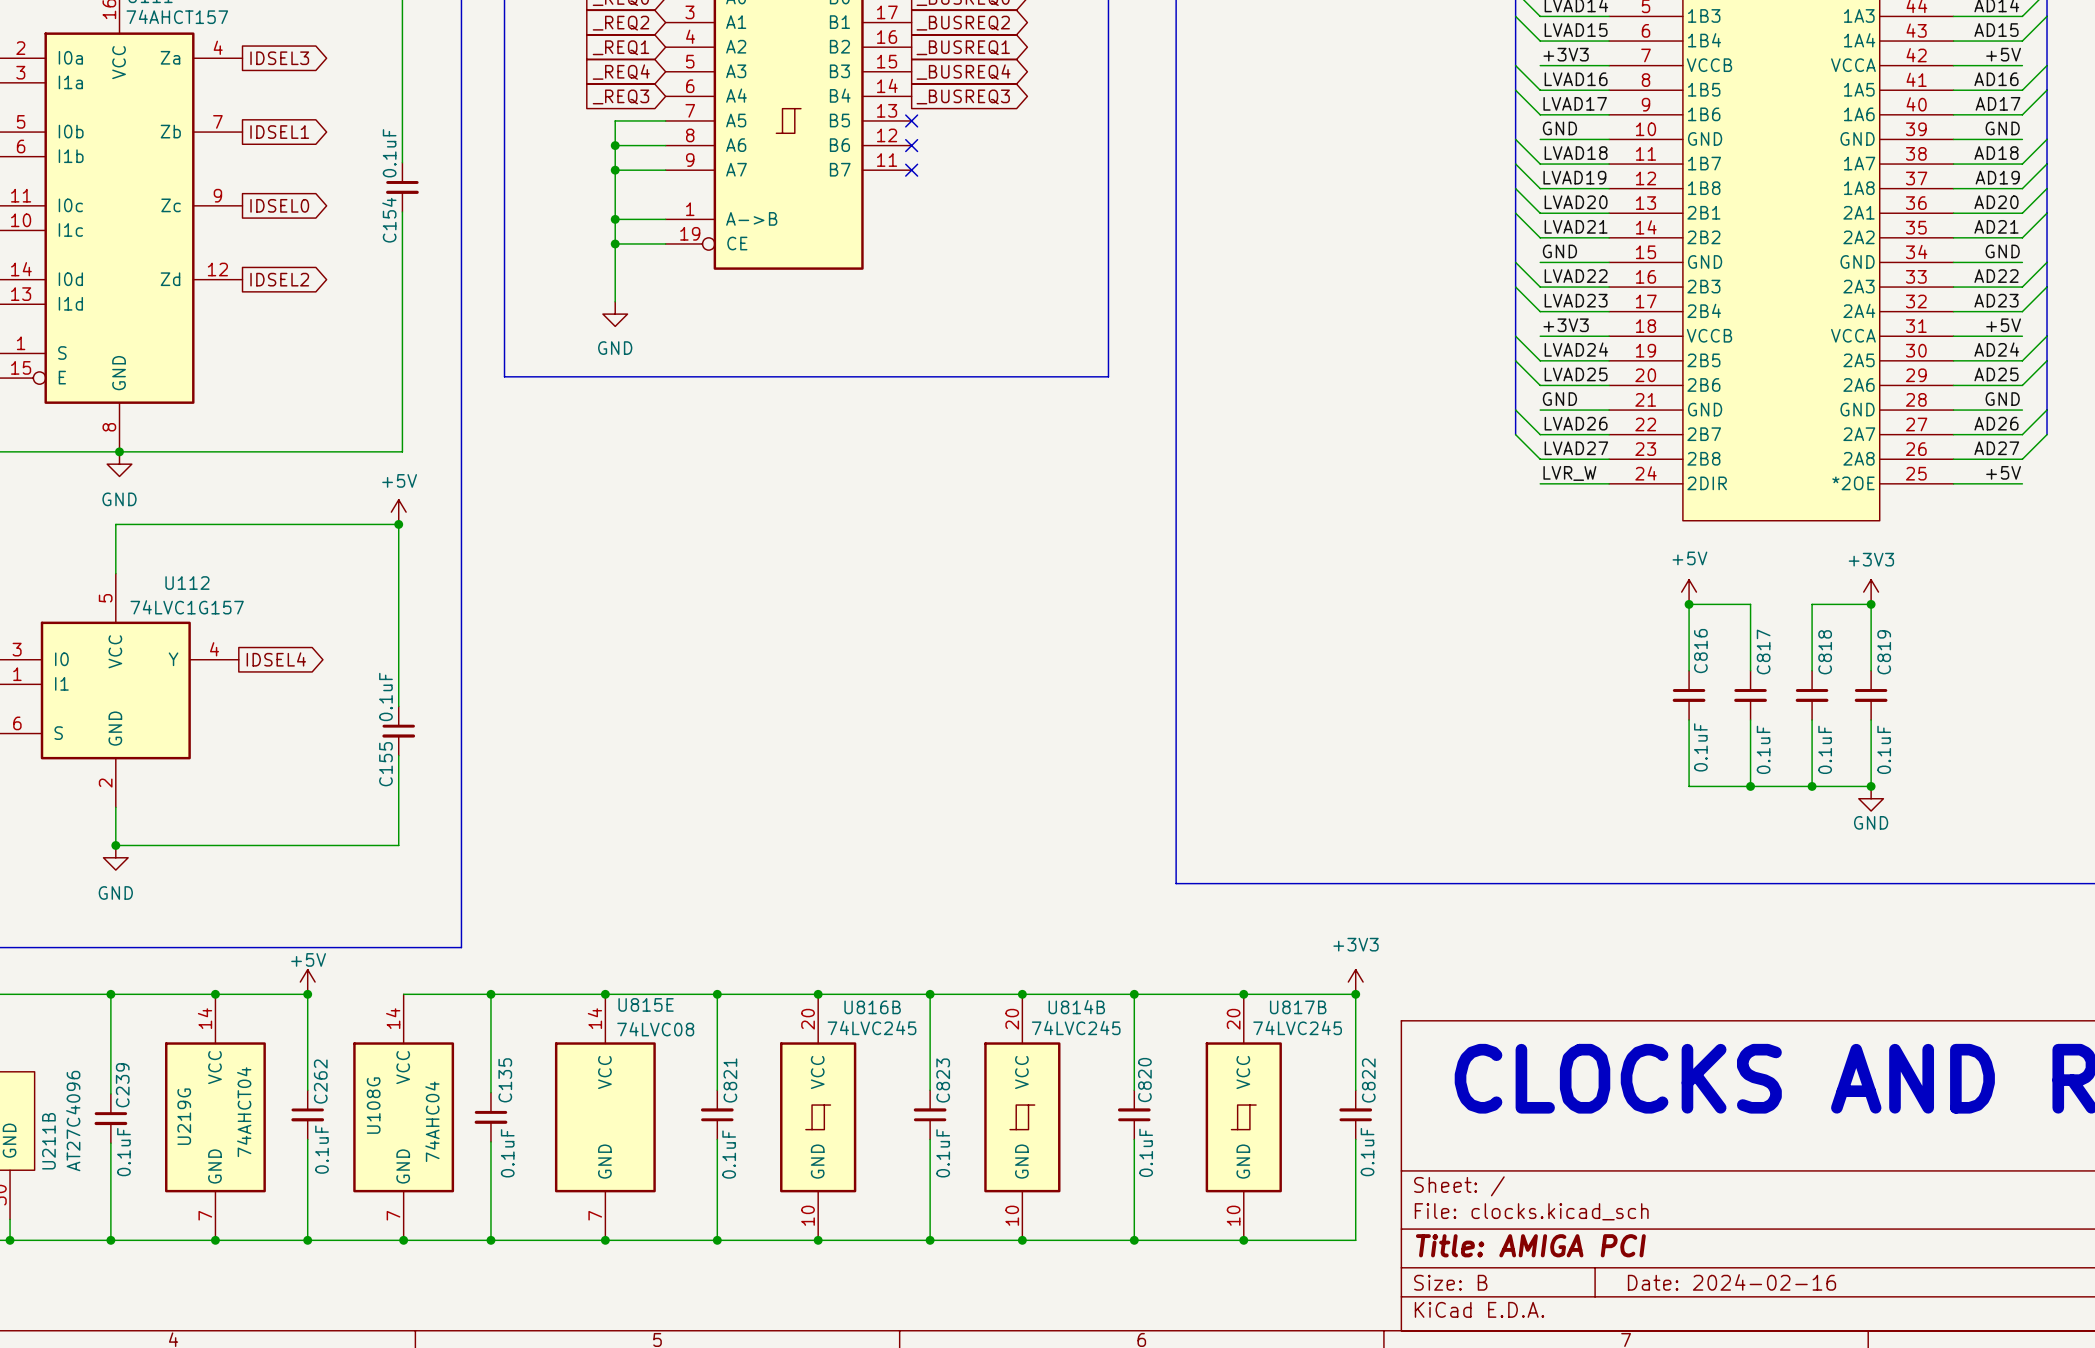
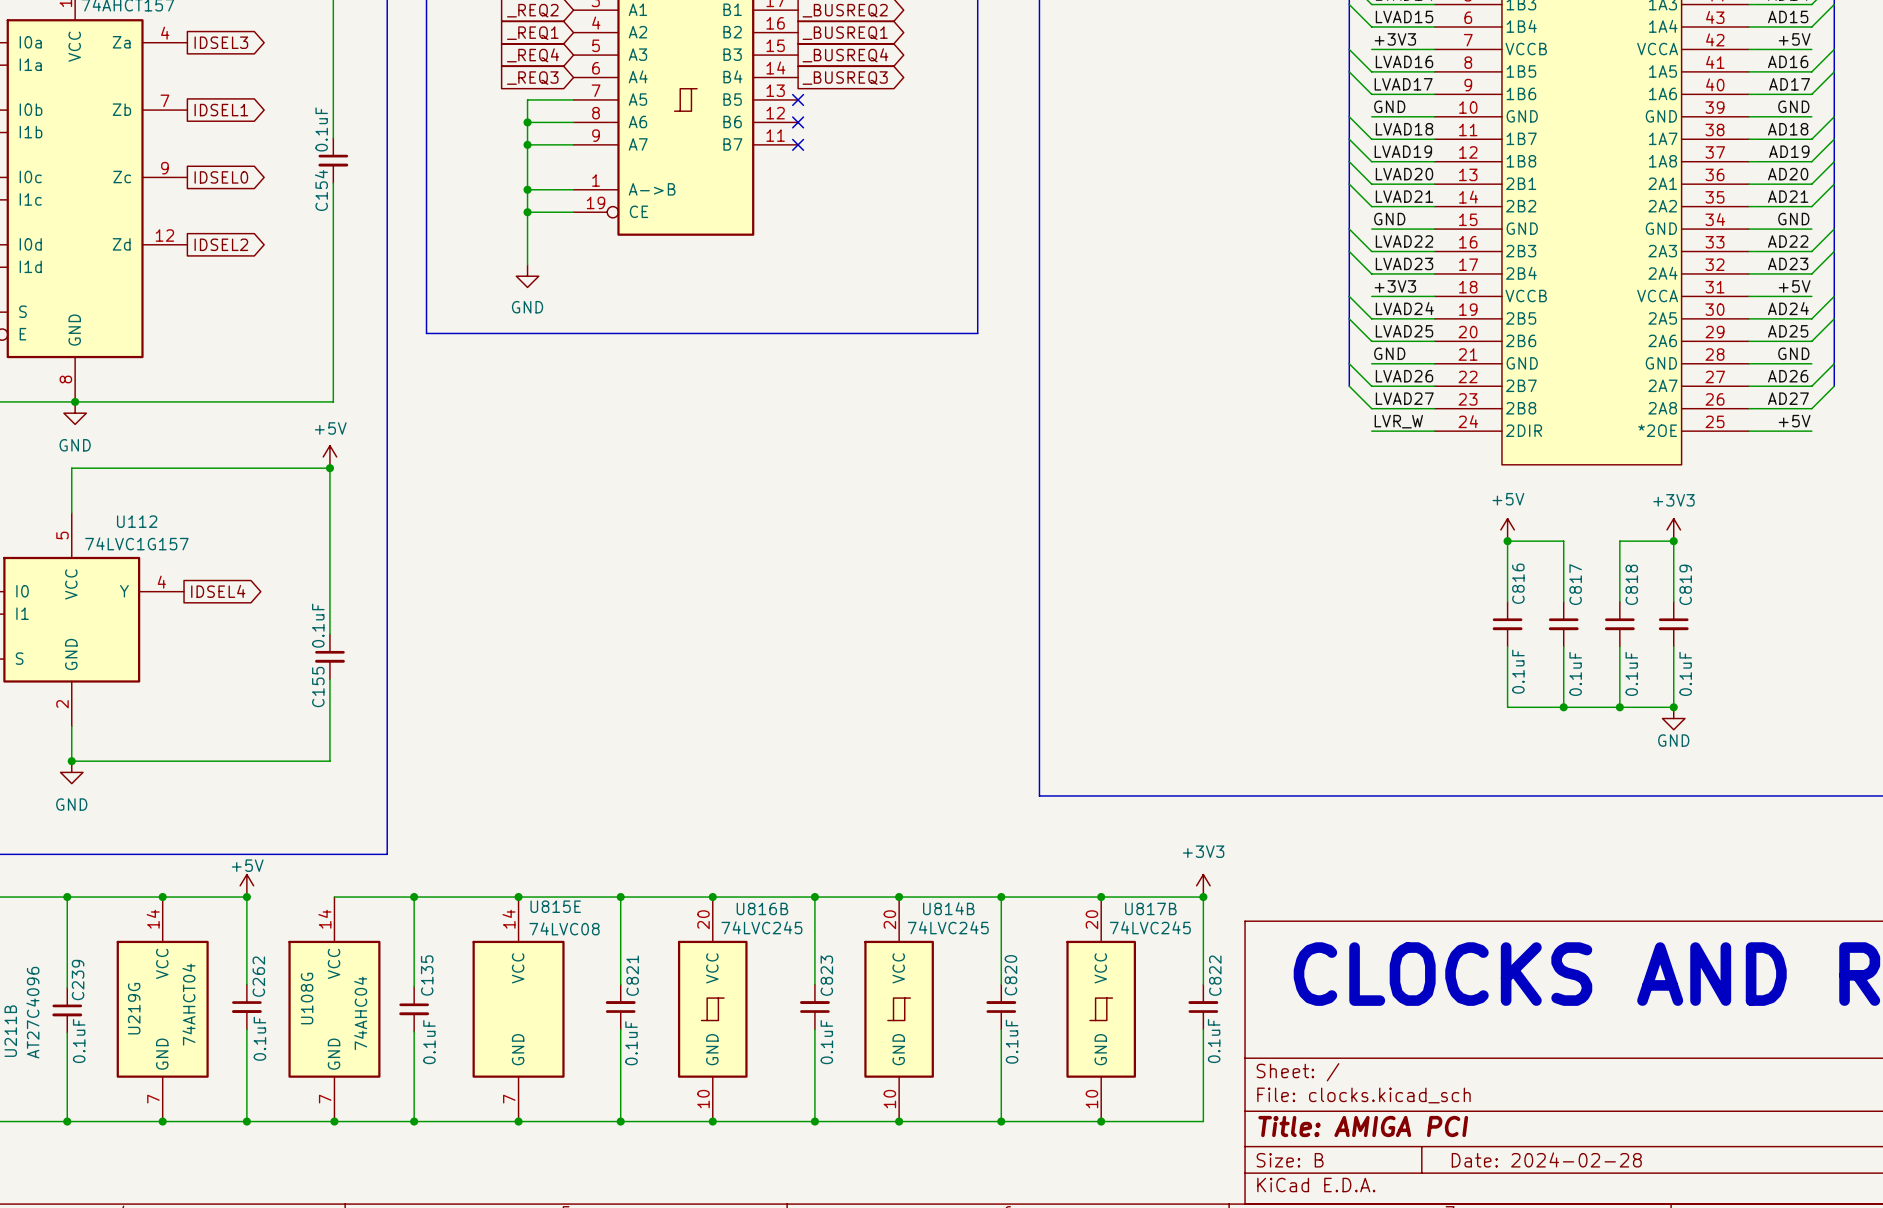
title block: Date: 2024-02-16 (1731, 1282) -> Date: 2024-02-28 (1546, 1159)

